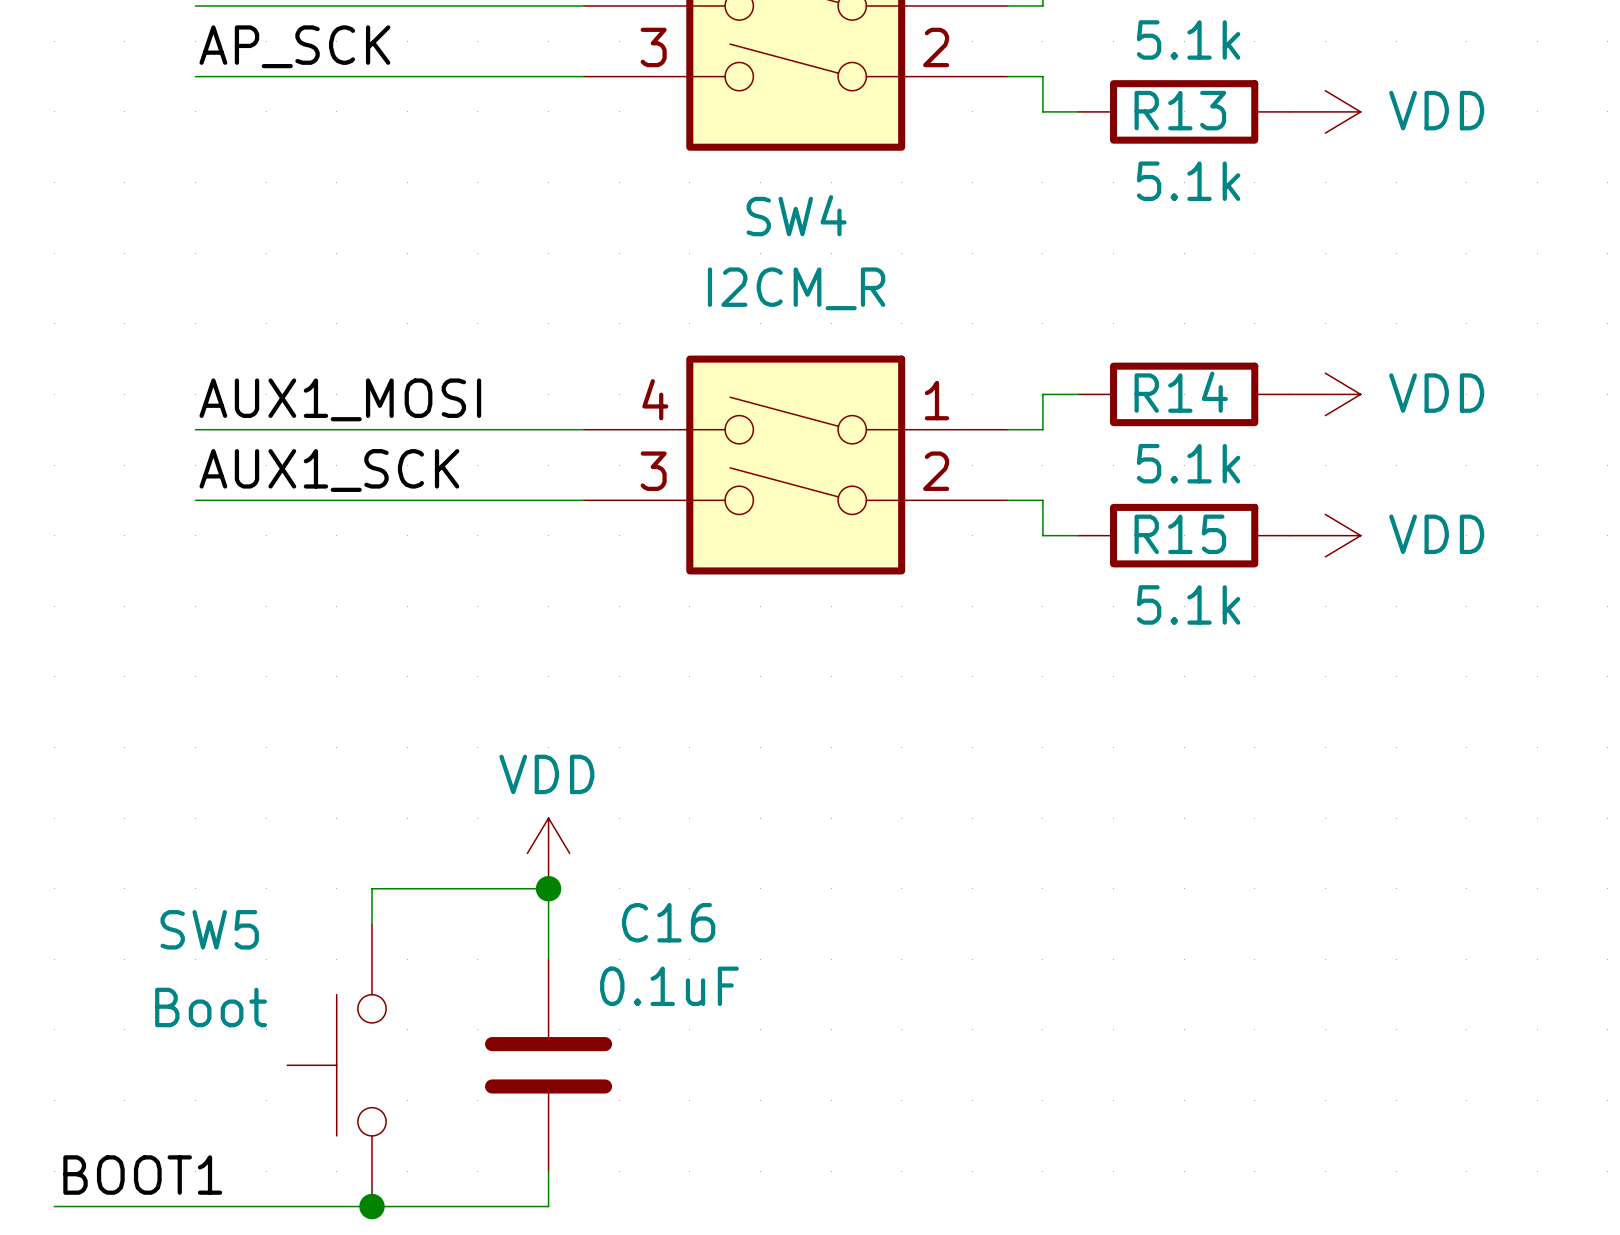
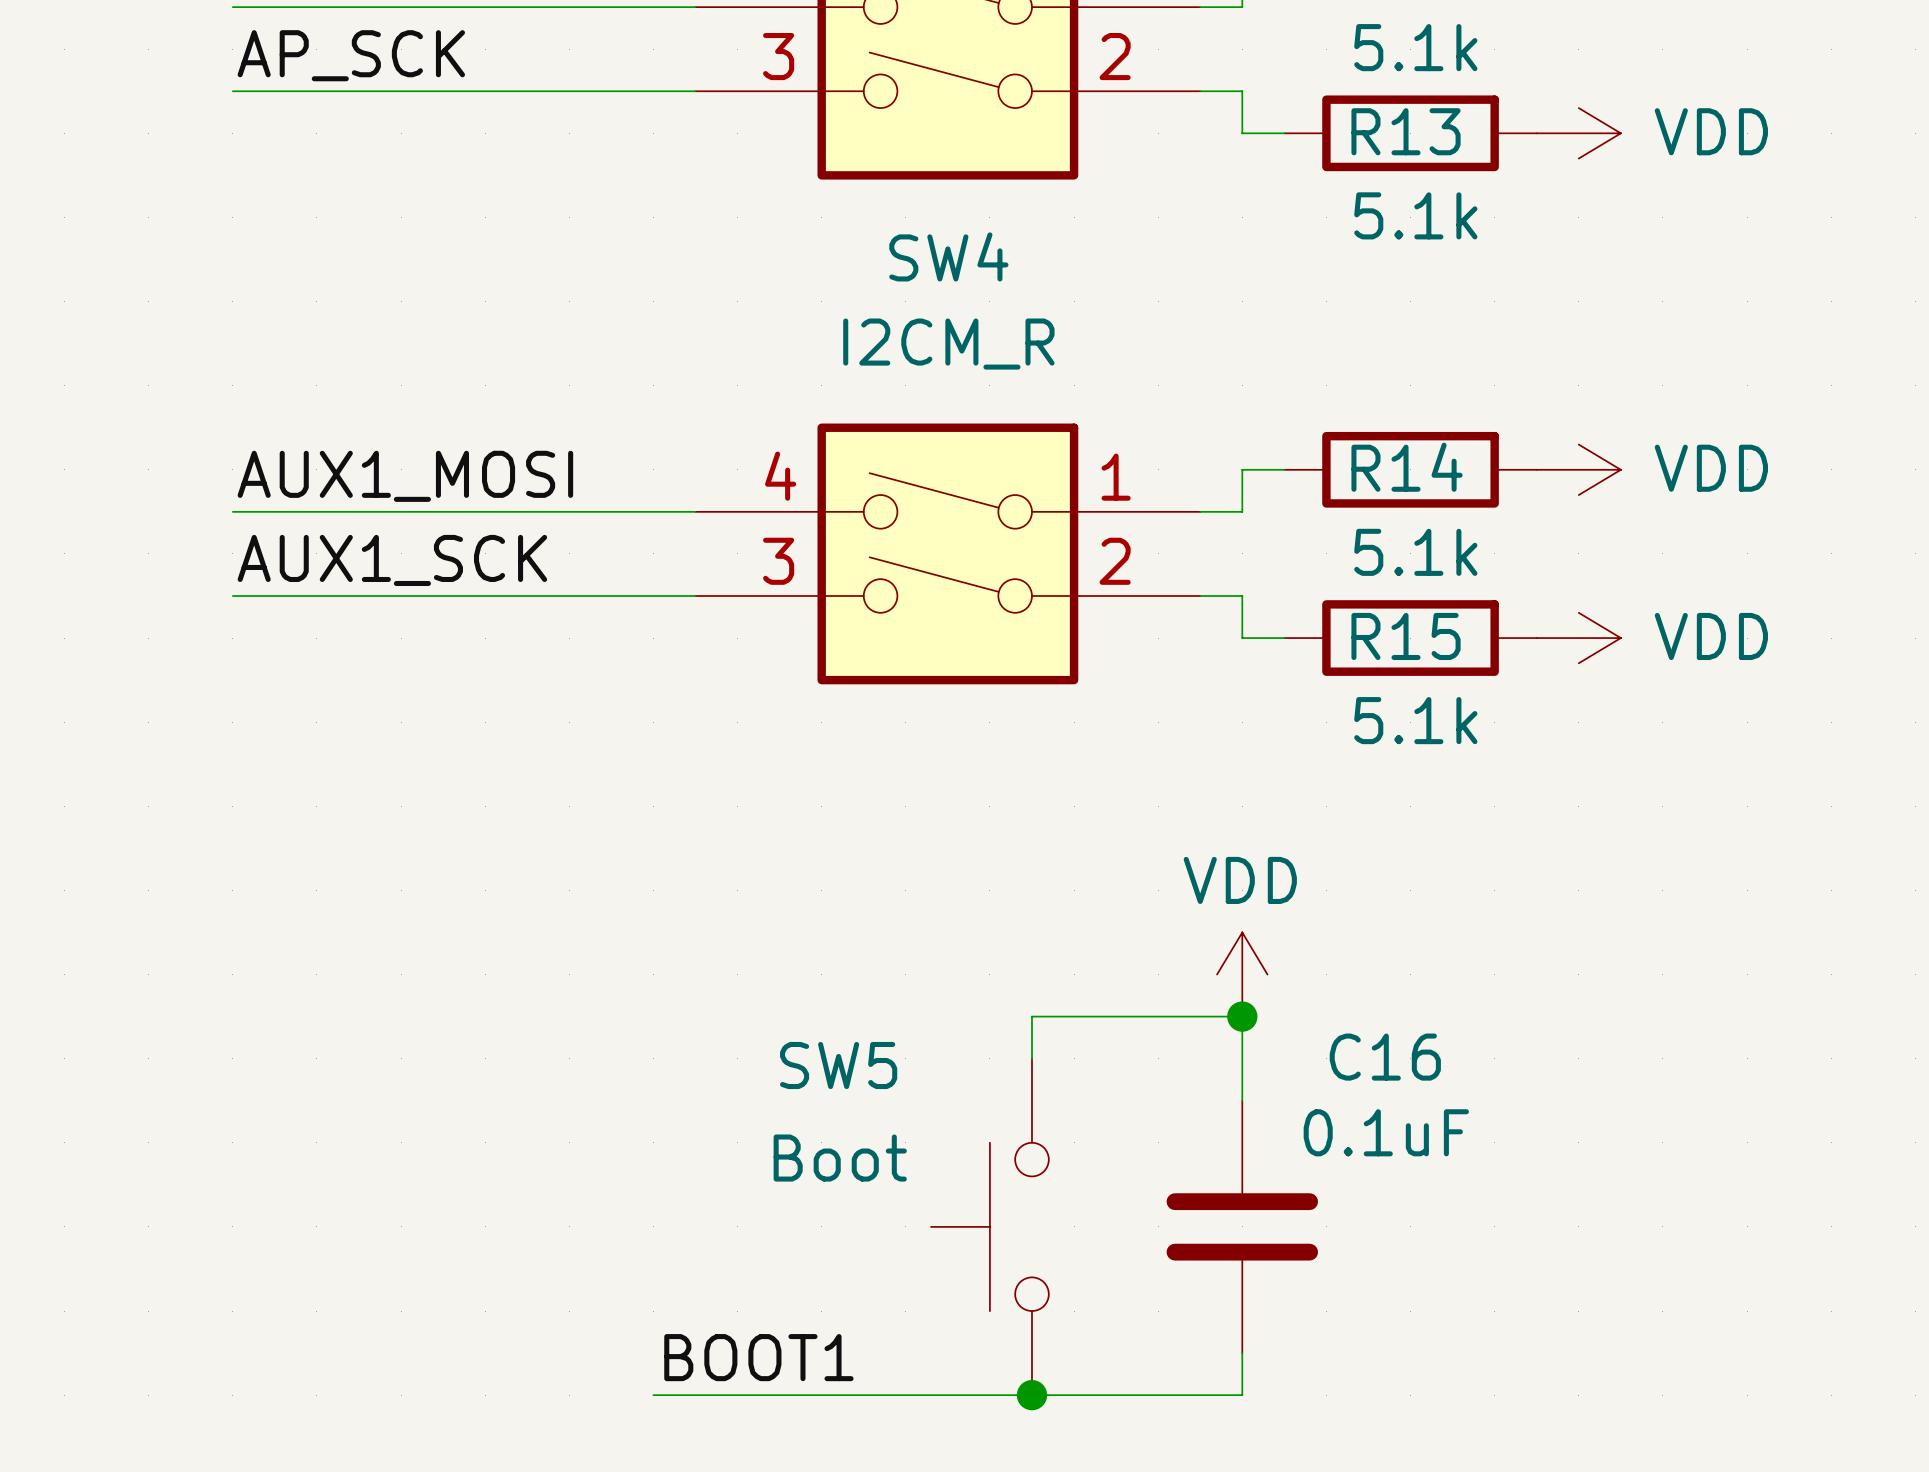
power symbol position: VDD (548, 853) -> VDD (1242, 974)
junction: none -> (1242, 1016)
junction: (548, 888) -> none
wire: (372, 924) (372, 888) (548, 888) (548, 959) -> (1031, 1058) (1031, 1016) (1242, 1016) (1242, 1100)
SW5 position: (336, 1065) -> (989, 1226)
C16 position: (548, 1065) -> (1242, 1226)
wire: (548, 1171) (548, 1206) (54, 1206) -> (653, 1395) (1242, 1395) (1242, 1353)
junction: none -> (1031, 1395)
label position: BOOT1 (142, 1175) -> BOOT1 (758, 1357)
junction: (372, 1206) -> none

